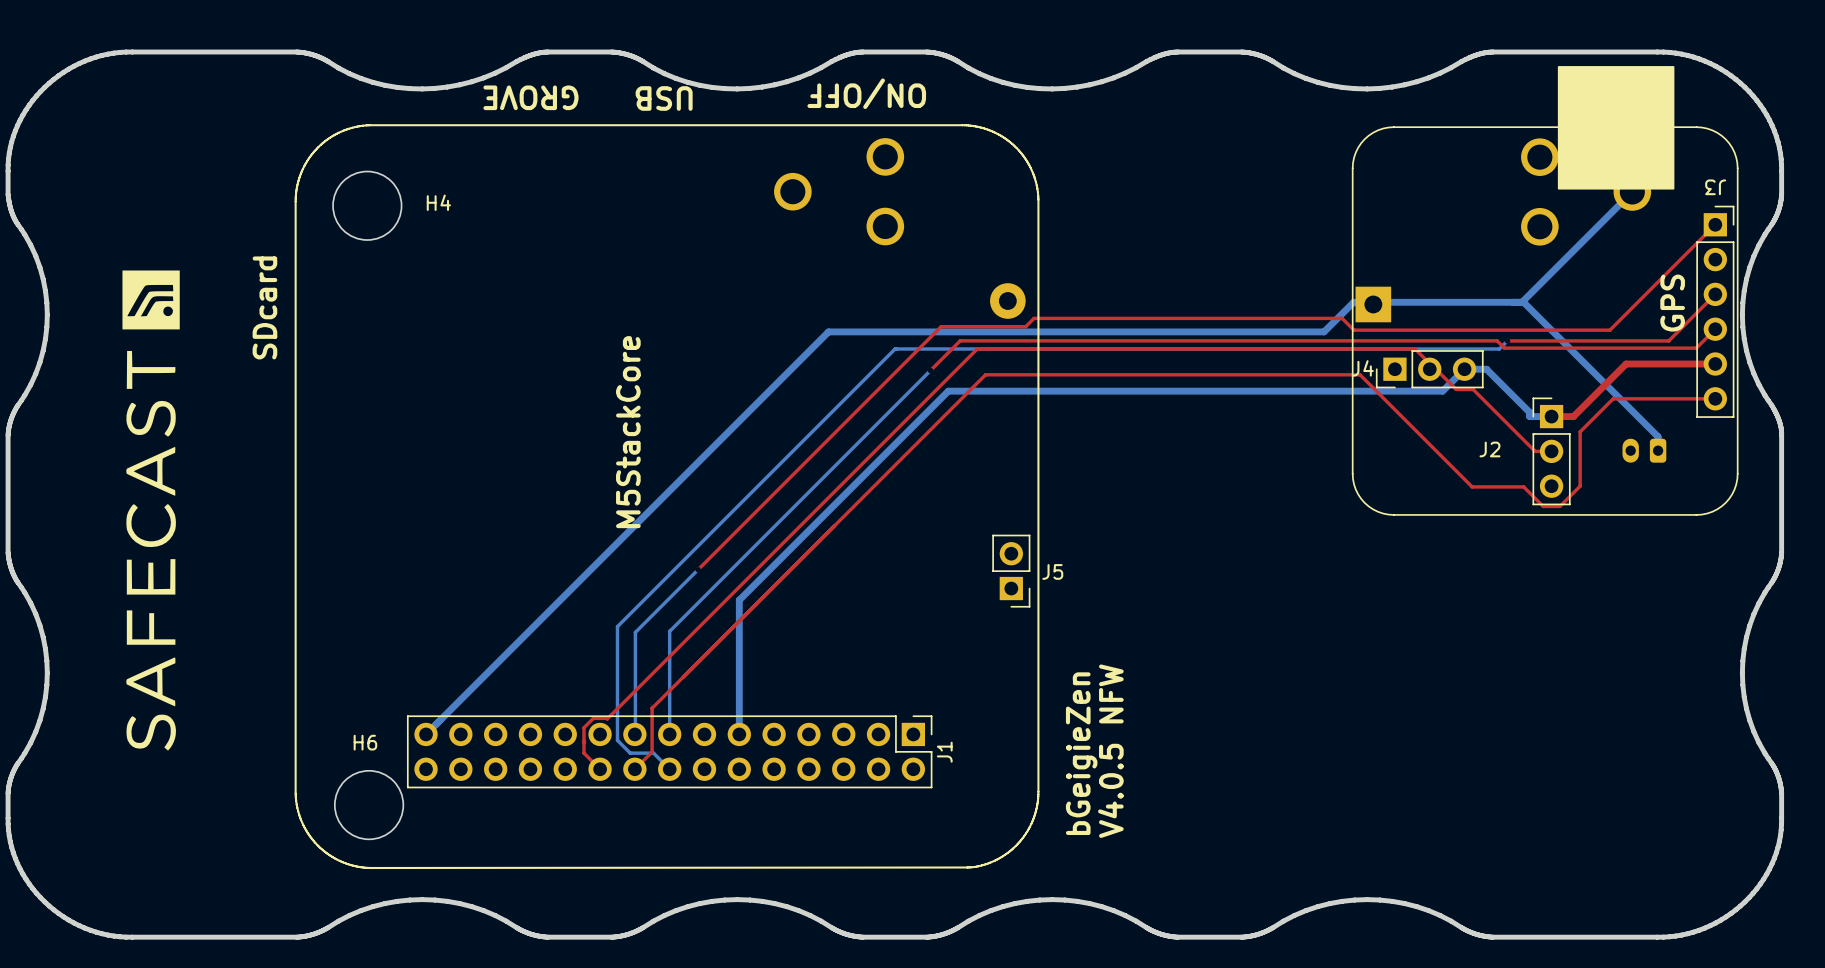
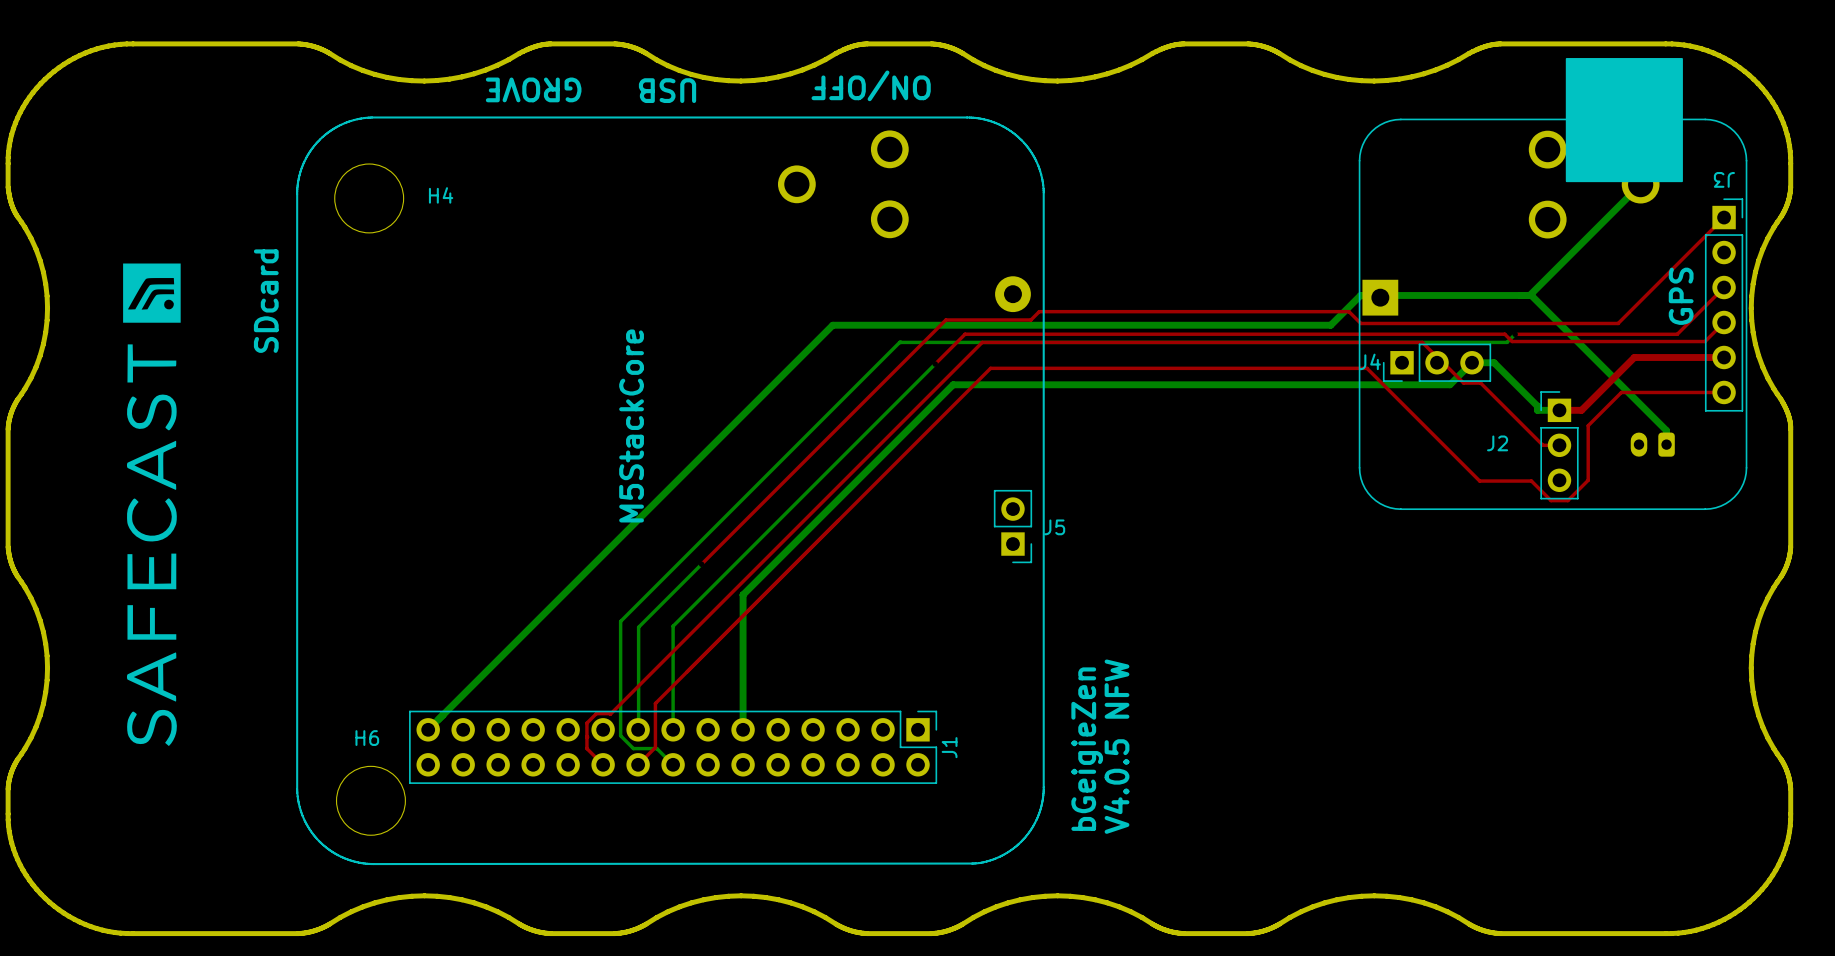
J5 position: (1011, 571) -> (1012, 526)

